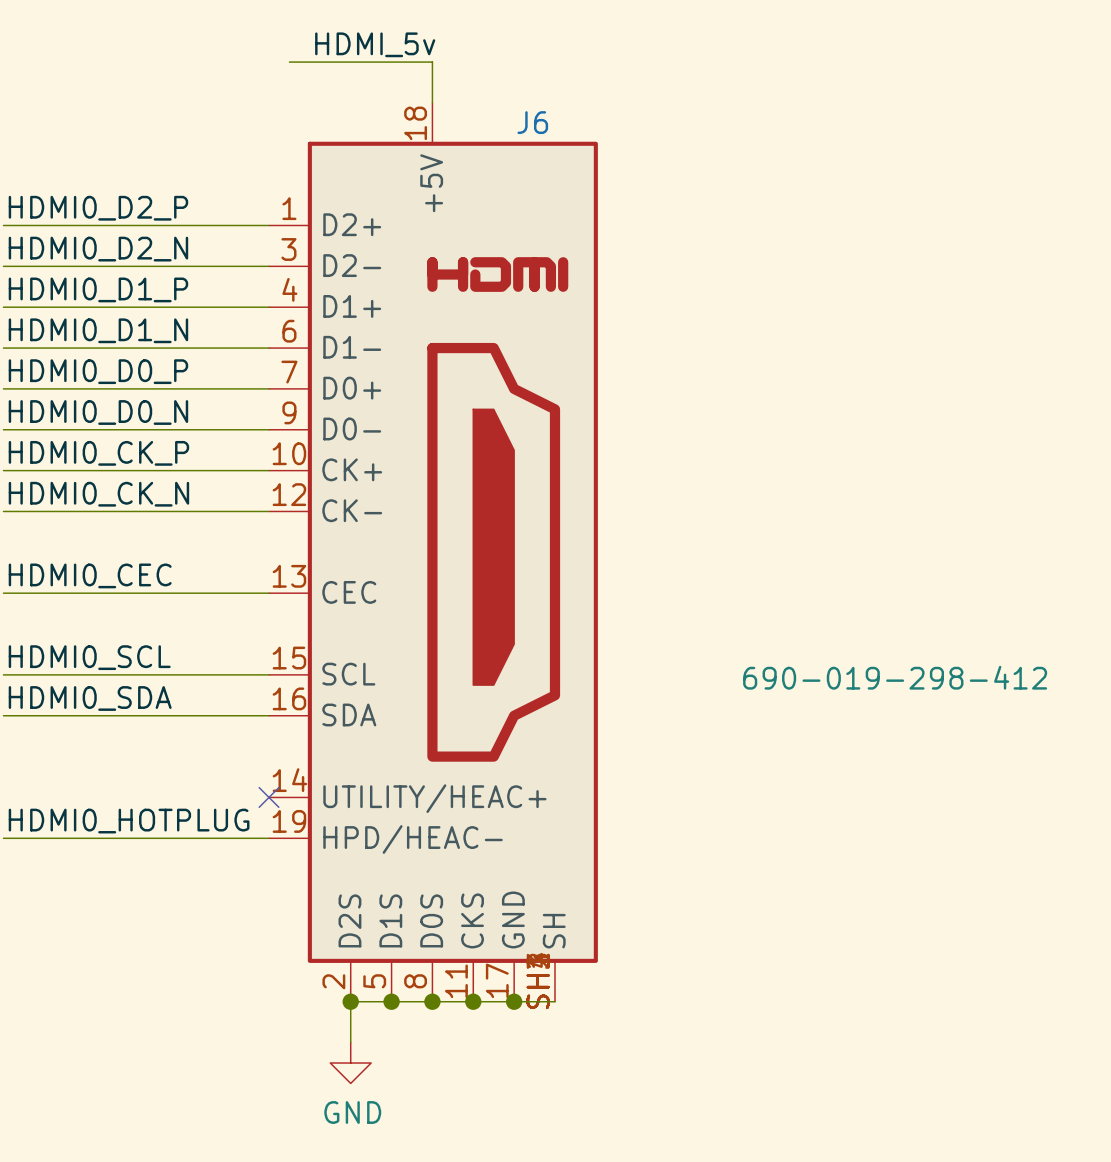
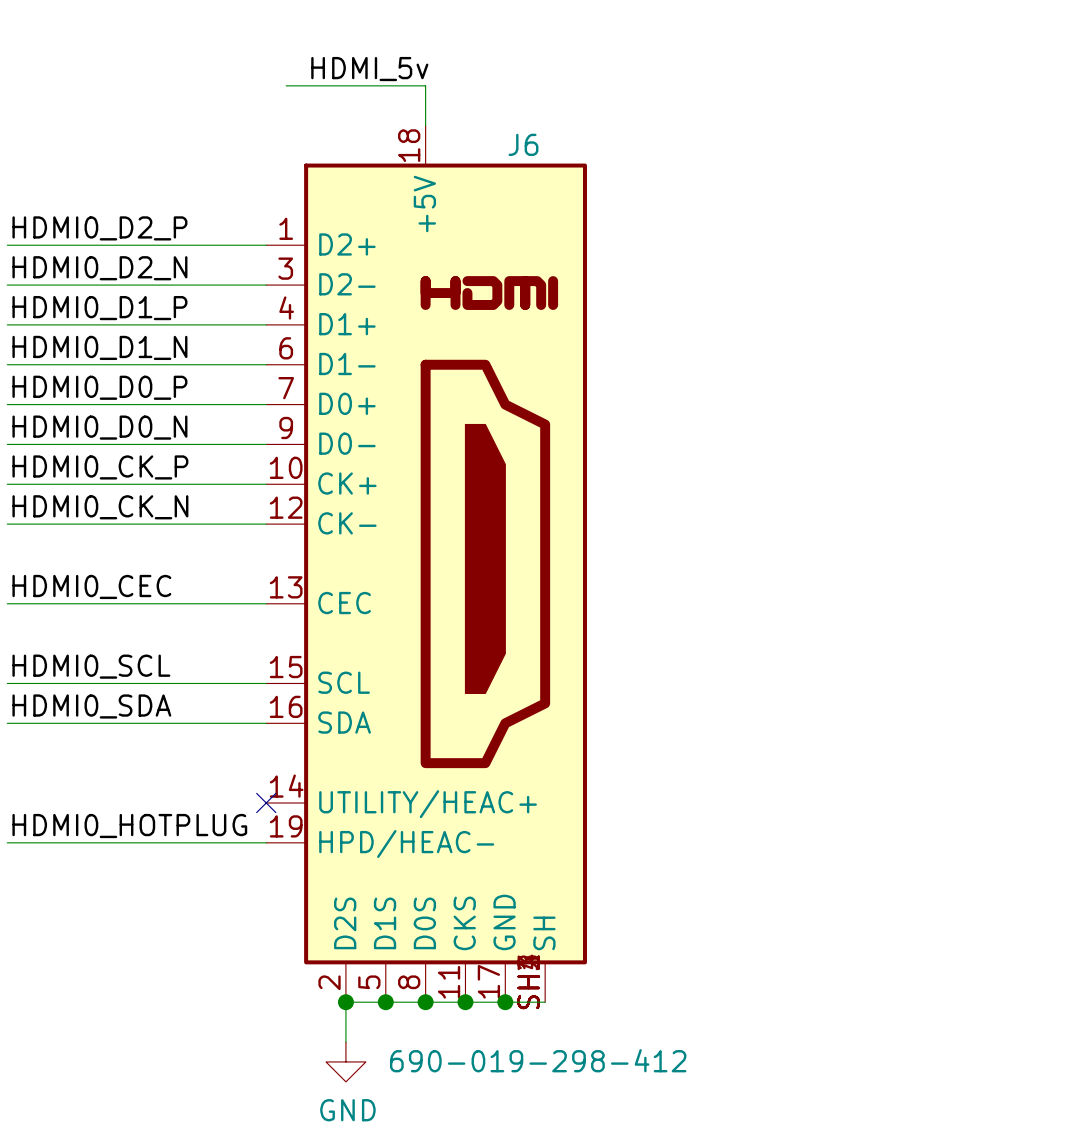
J6 value position: 690-019-298-412 (895, 677) -> 690-019-298-412 (538, 1060)

